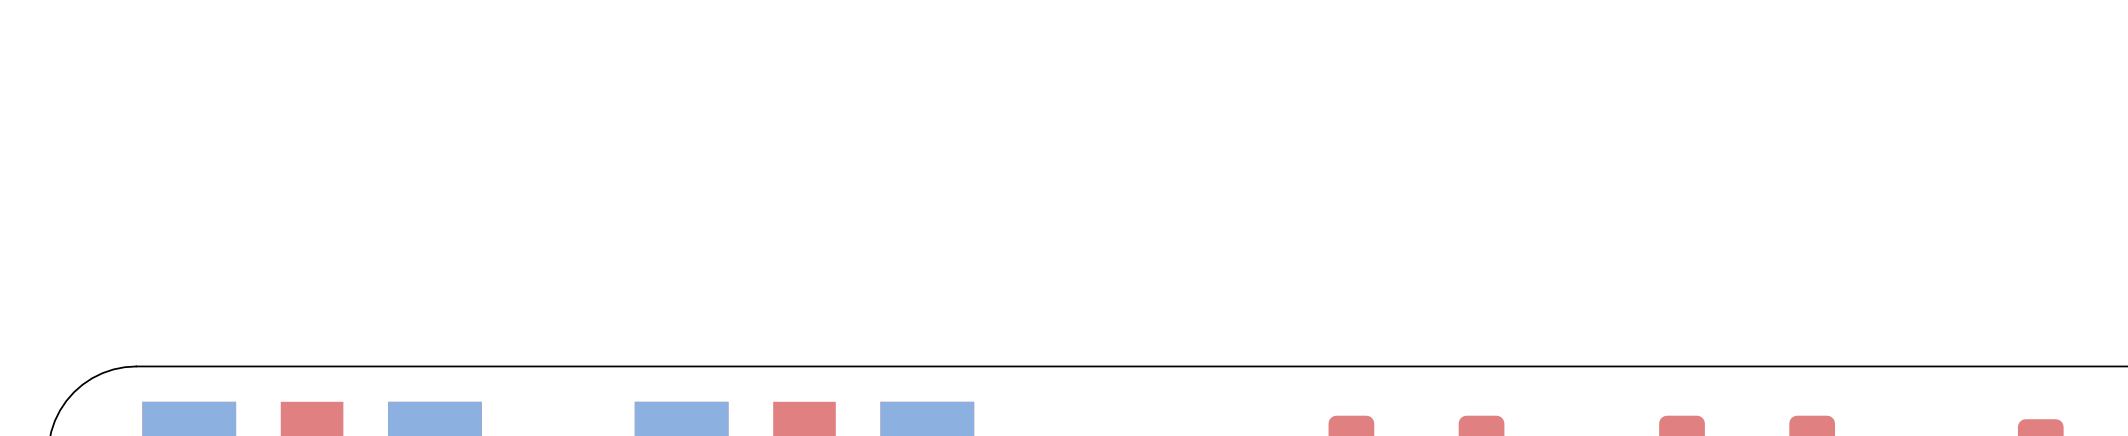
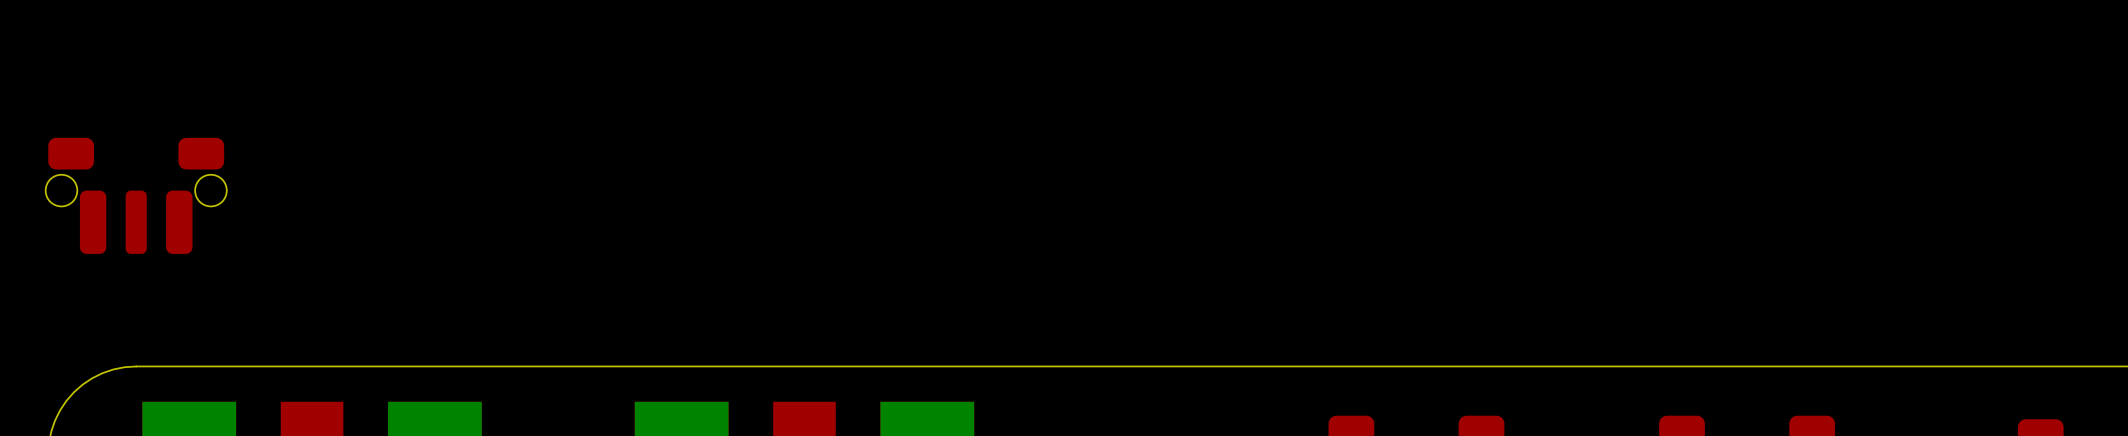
part: none -> (136, 195)

